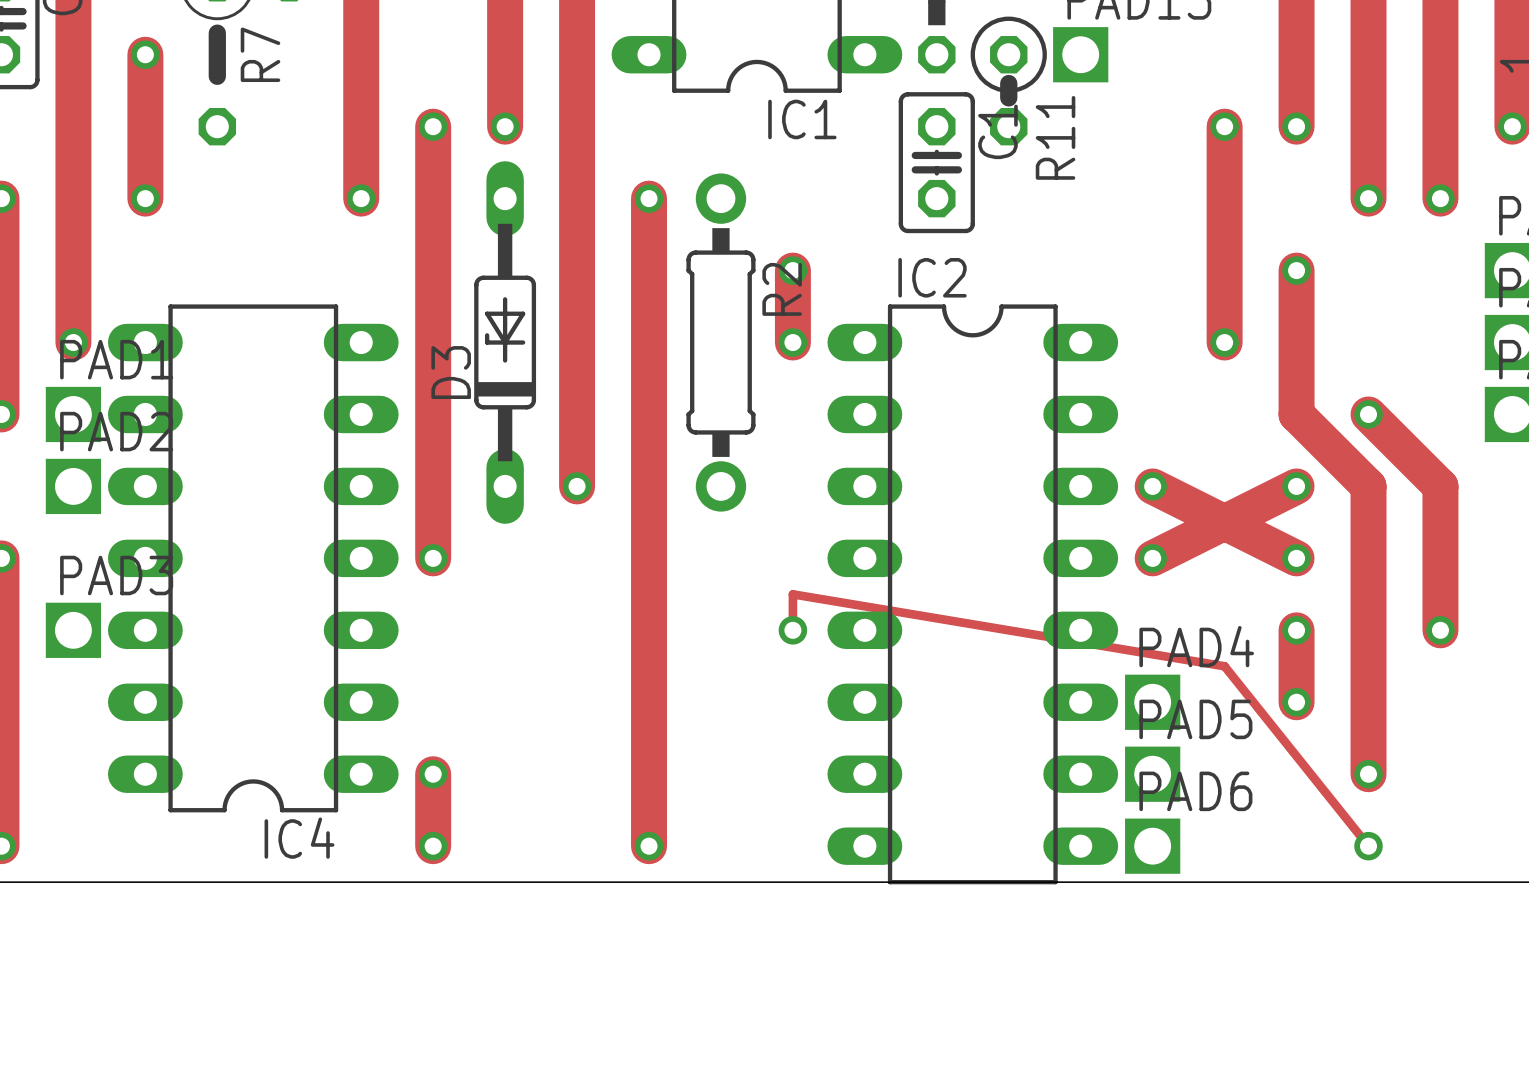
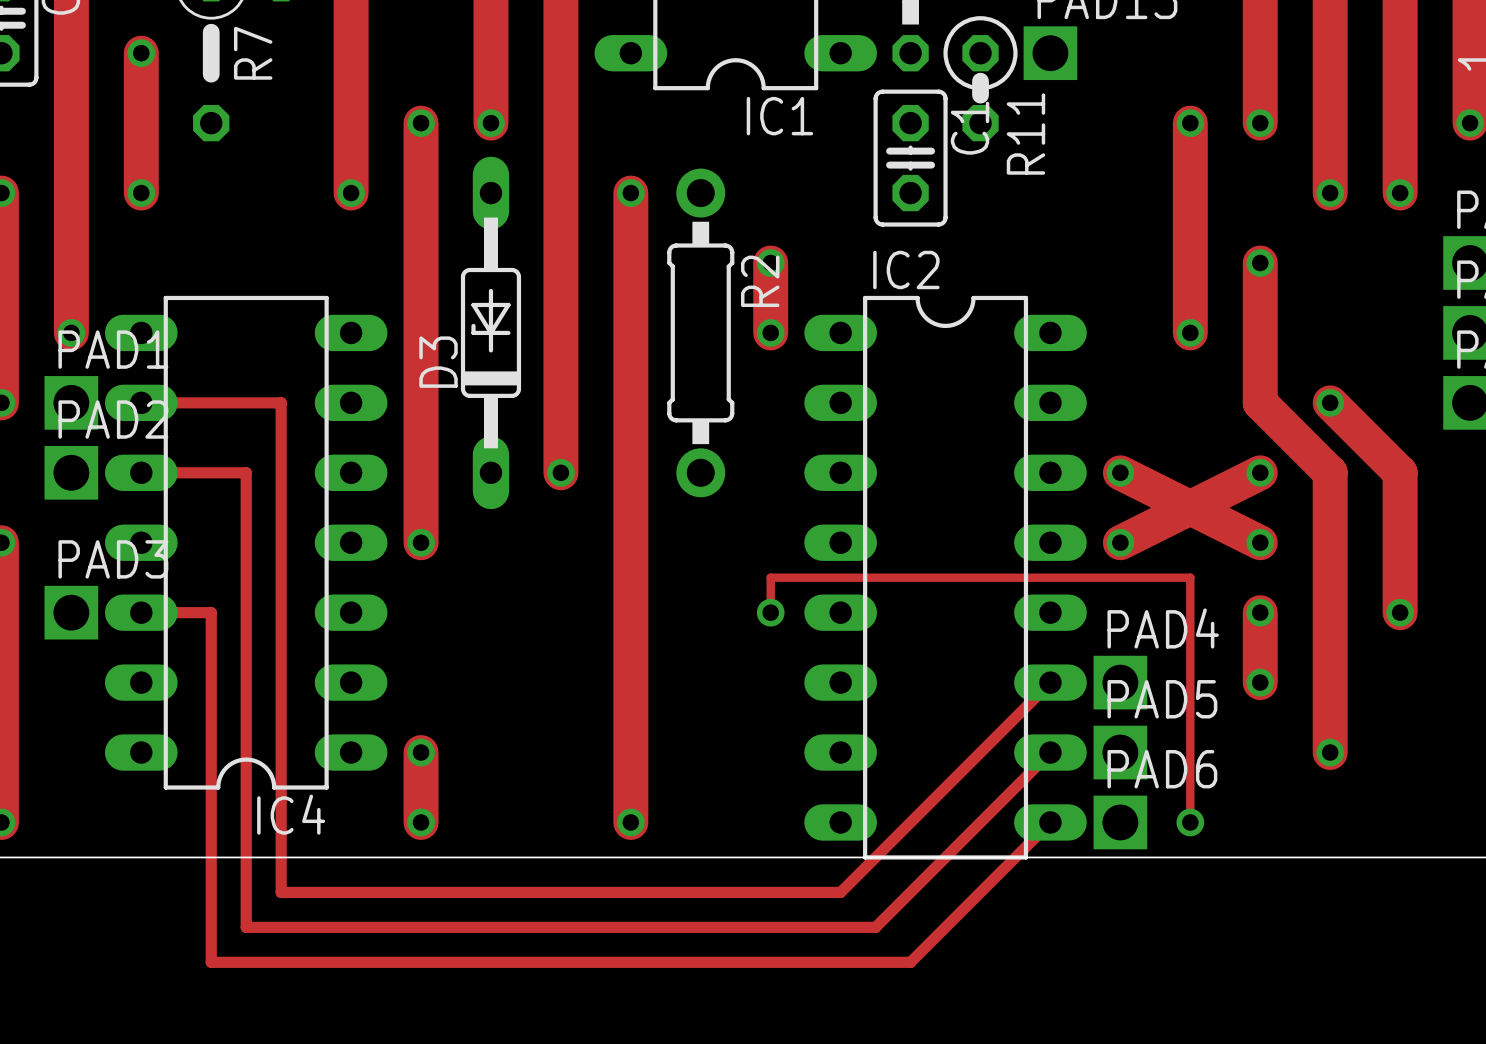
track: none -> (141, 402) (281, 402) (281, 892) (840, 892) (1050, 682)
track: none -> (141, 472) (246, 472) (246, 927) (875, 927) (1050, 752)
track: (792, 594) (1224, 666) (1368, 846) -> (770, 577) (1190, 577) (1190, 822)
track: none -> (141, 612) (211, 612) (211, 962) (910, 962) (1050, 822)
via position: (1368, 846) -> (1190, 822)

